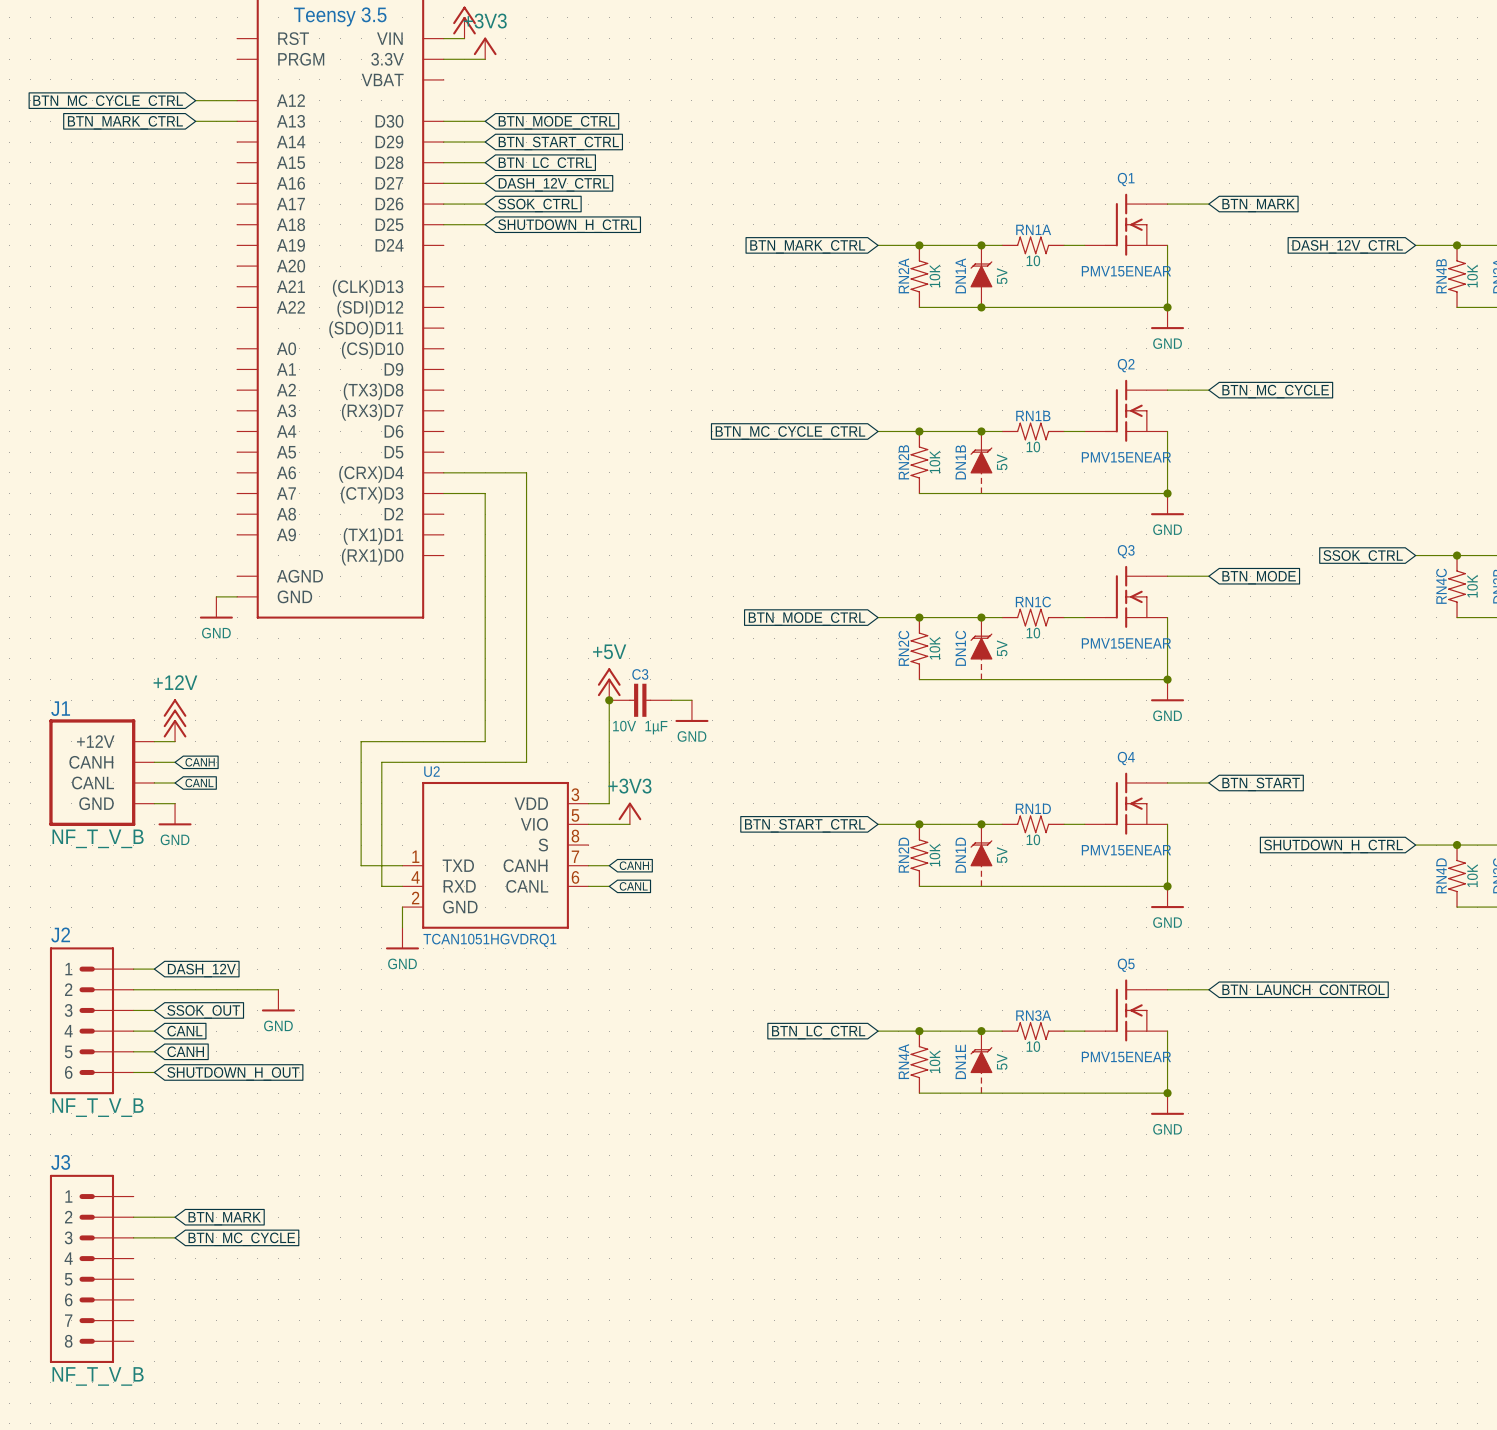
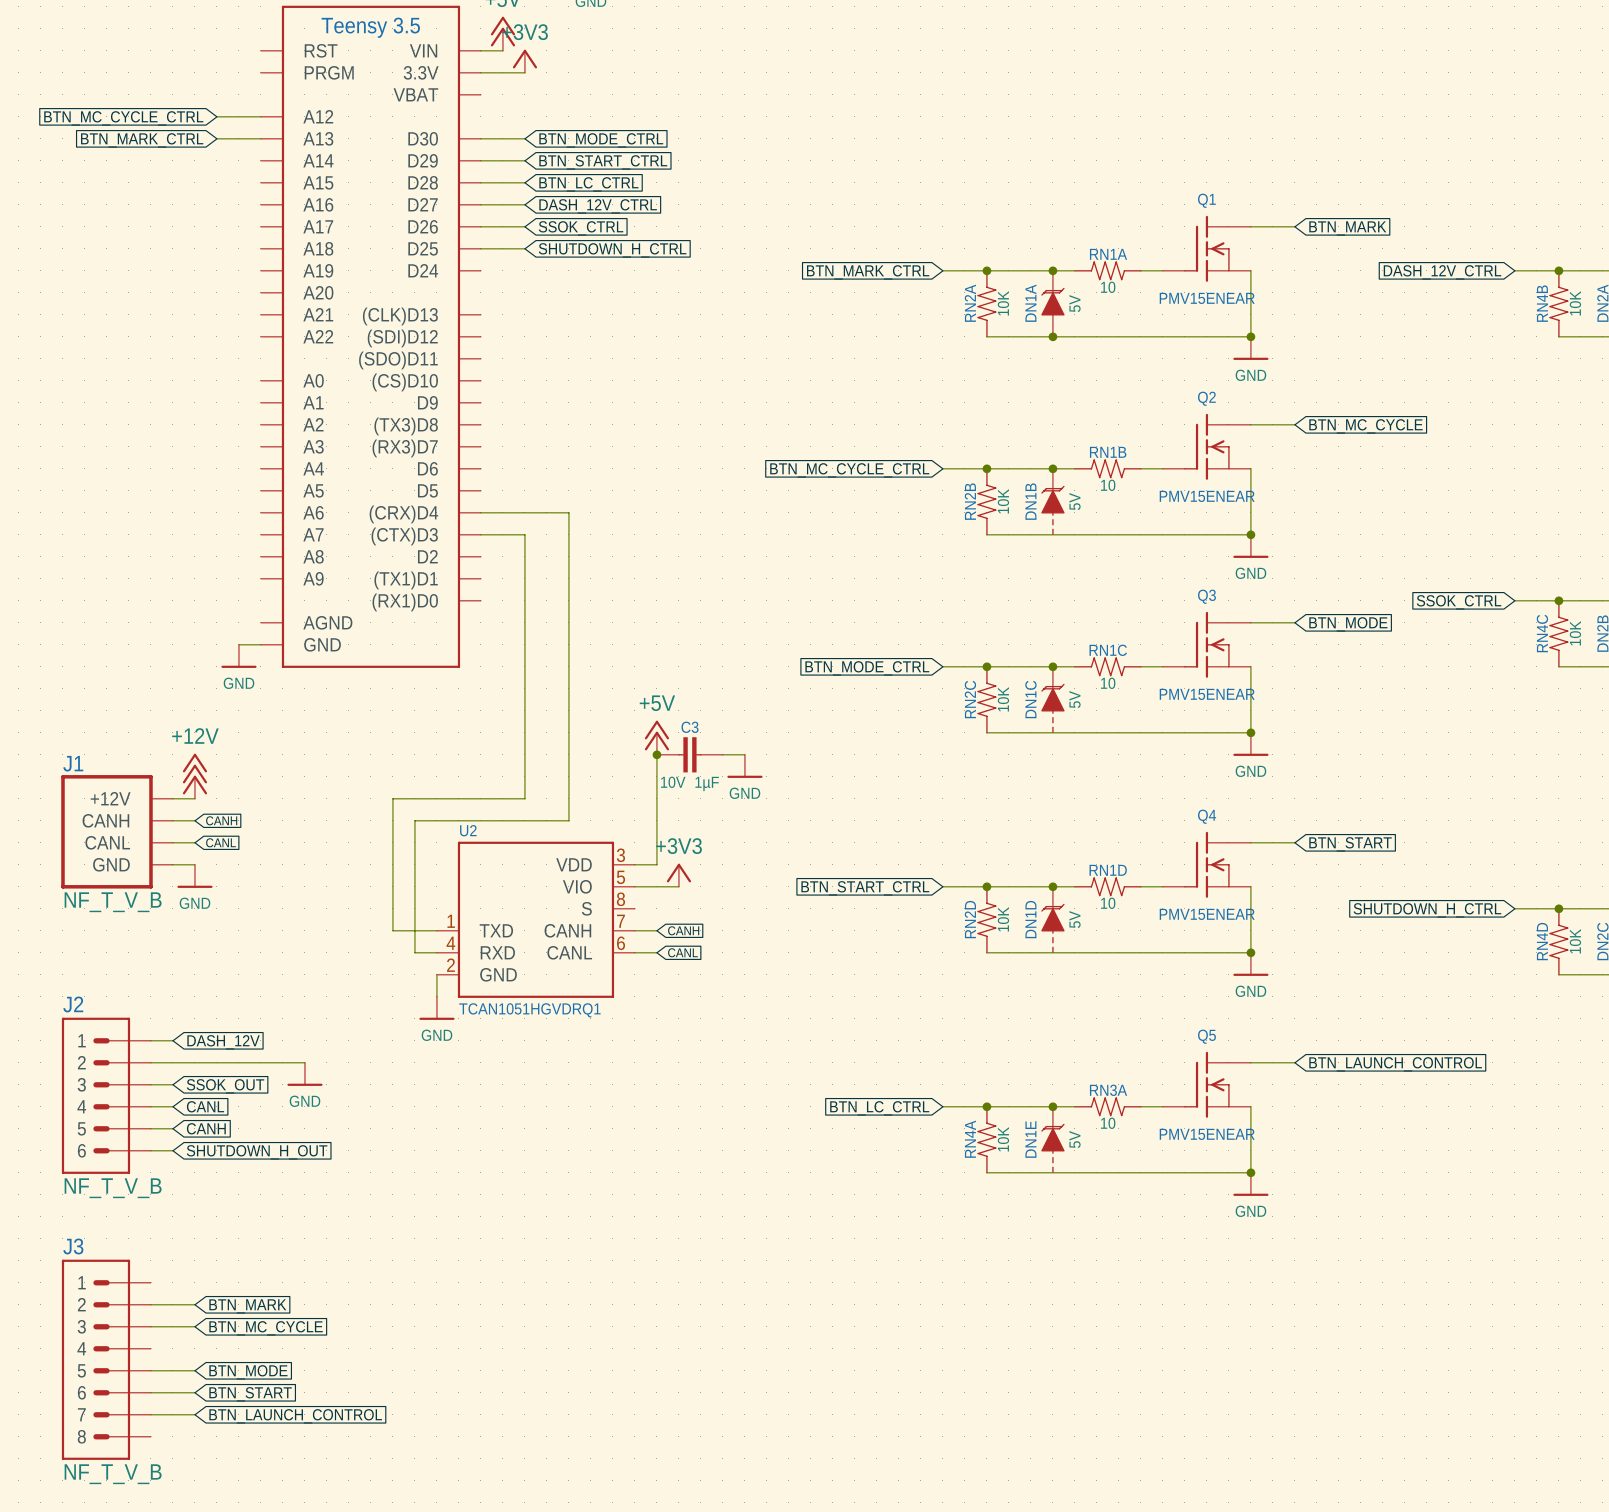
wire: none -> (150, 1370) (194, 1370)
global label: none -> BTN_MODE (248, 1372)
wire: none -> (150, 1392) (194, 1392)
global label: none -> BTN_START (250, 1394)
wire: none -> (150, 1414) (194, 1414)
global label: none -> BTN_LAUNCH_CONTROL (295, 1416)

